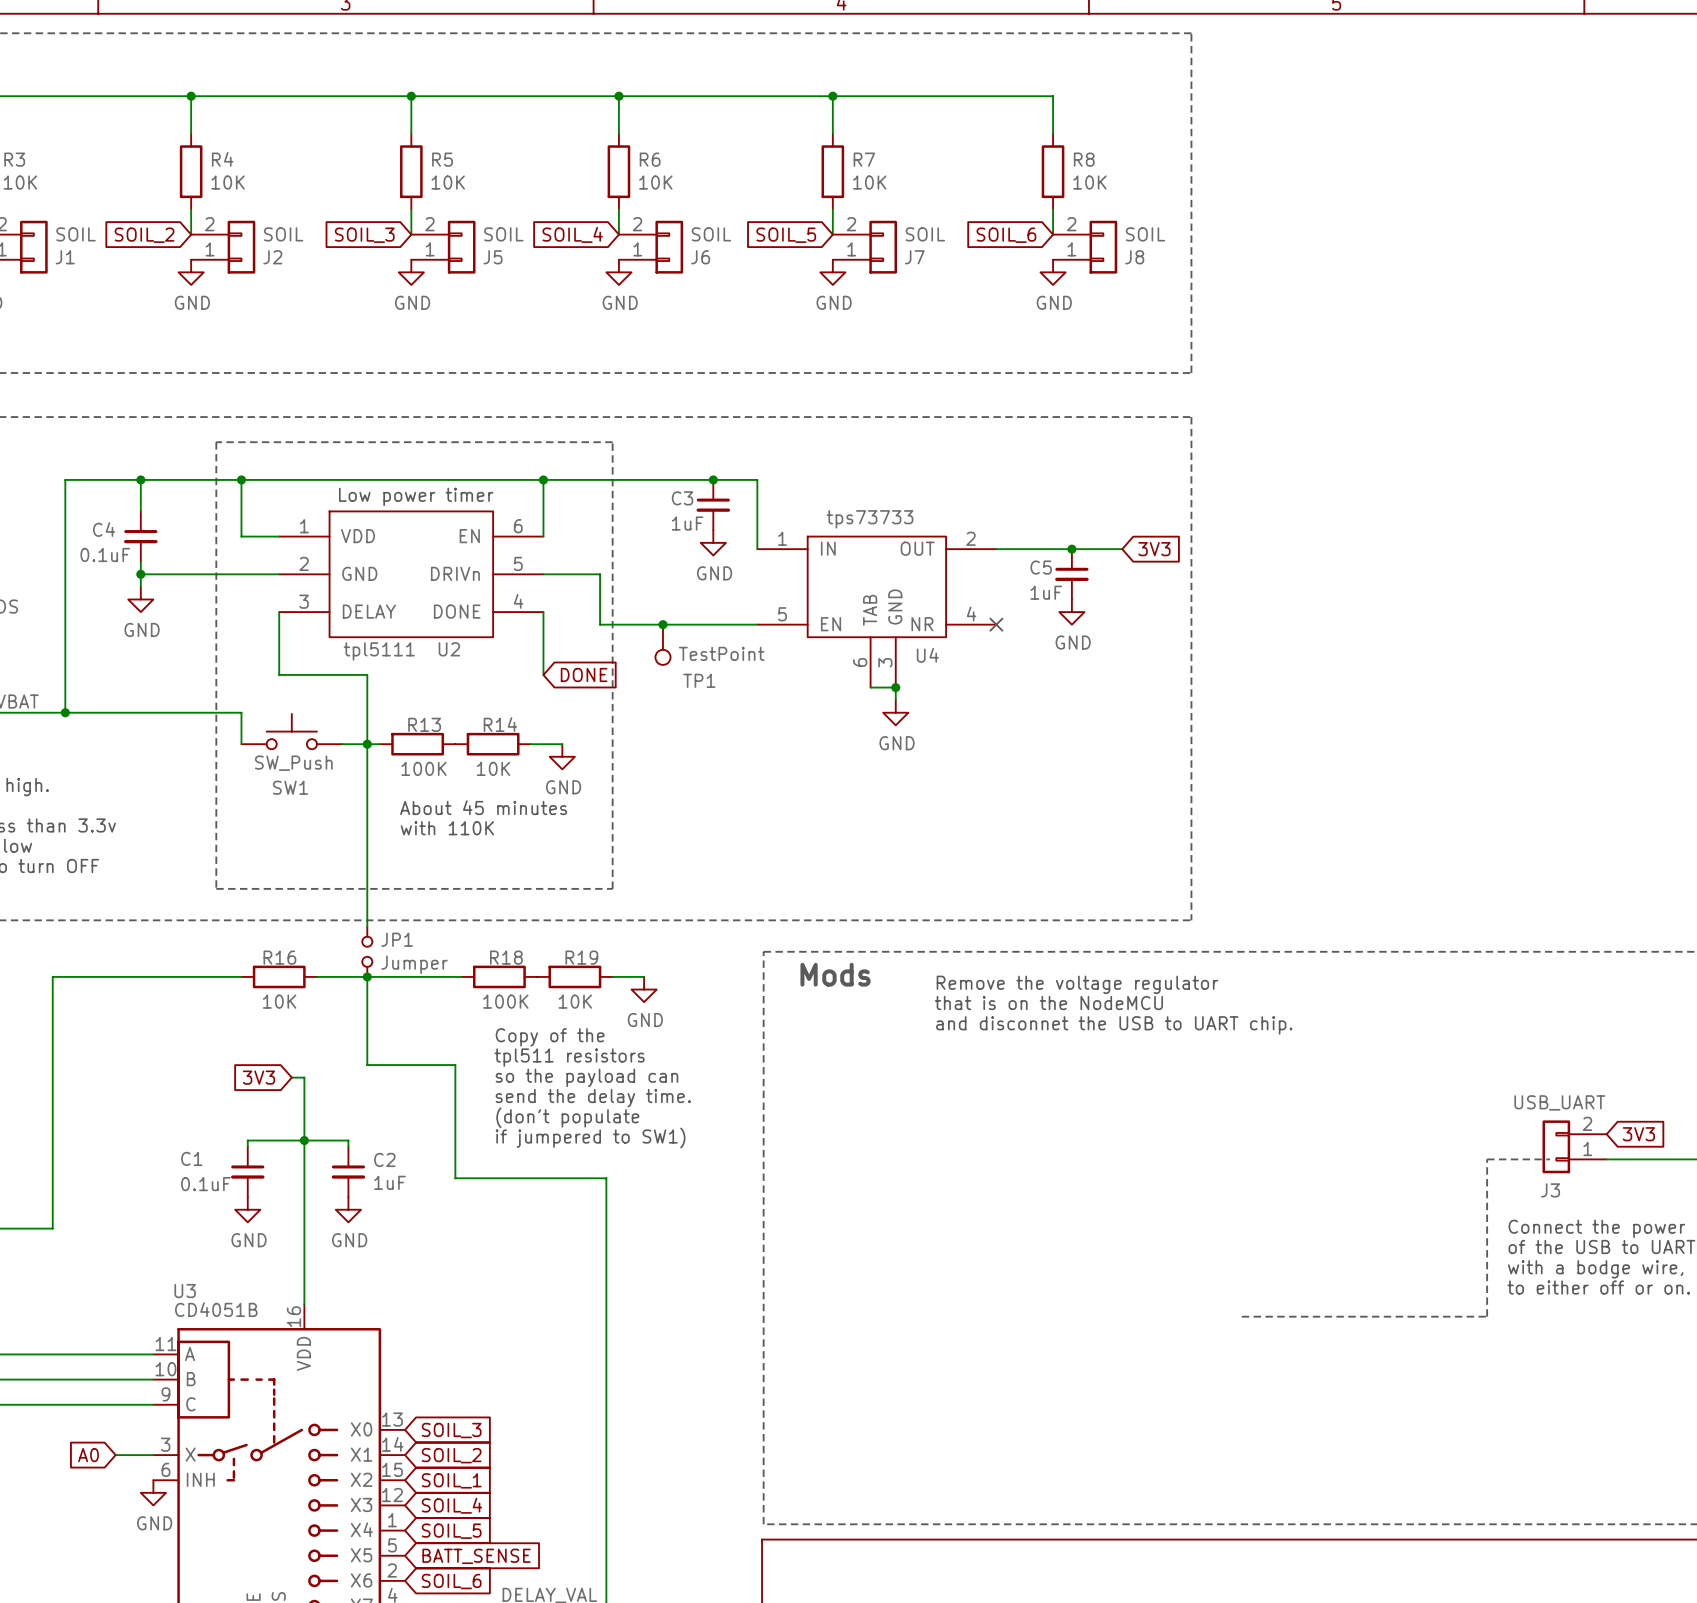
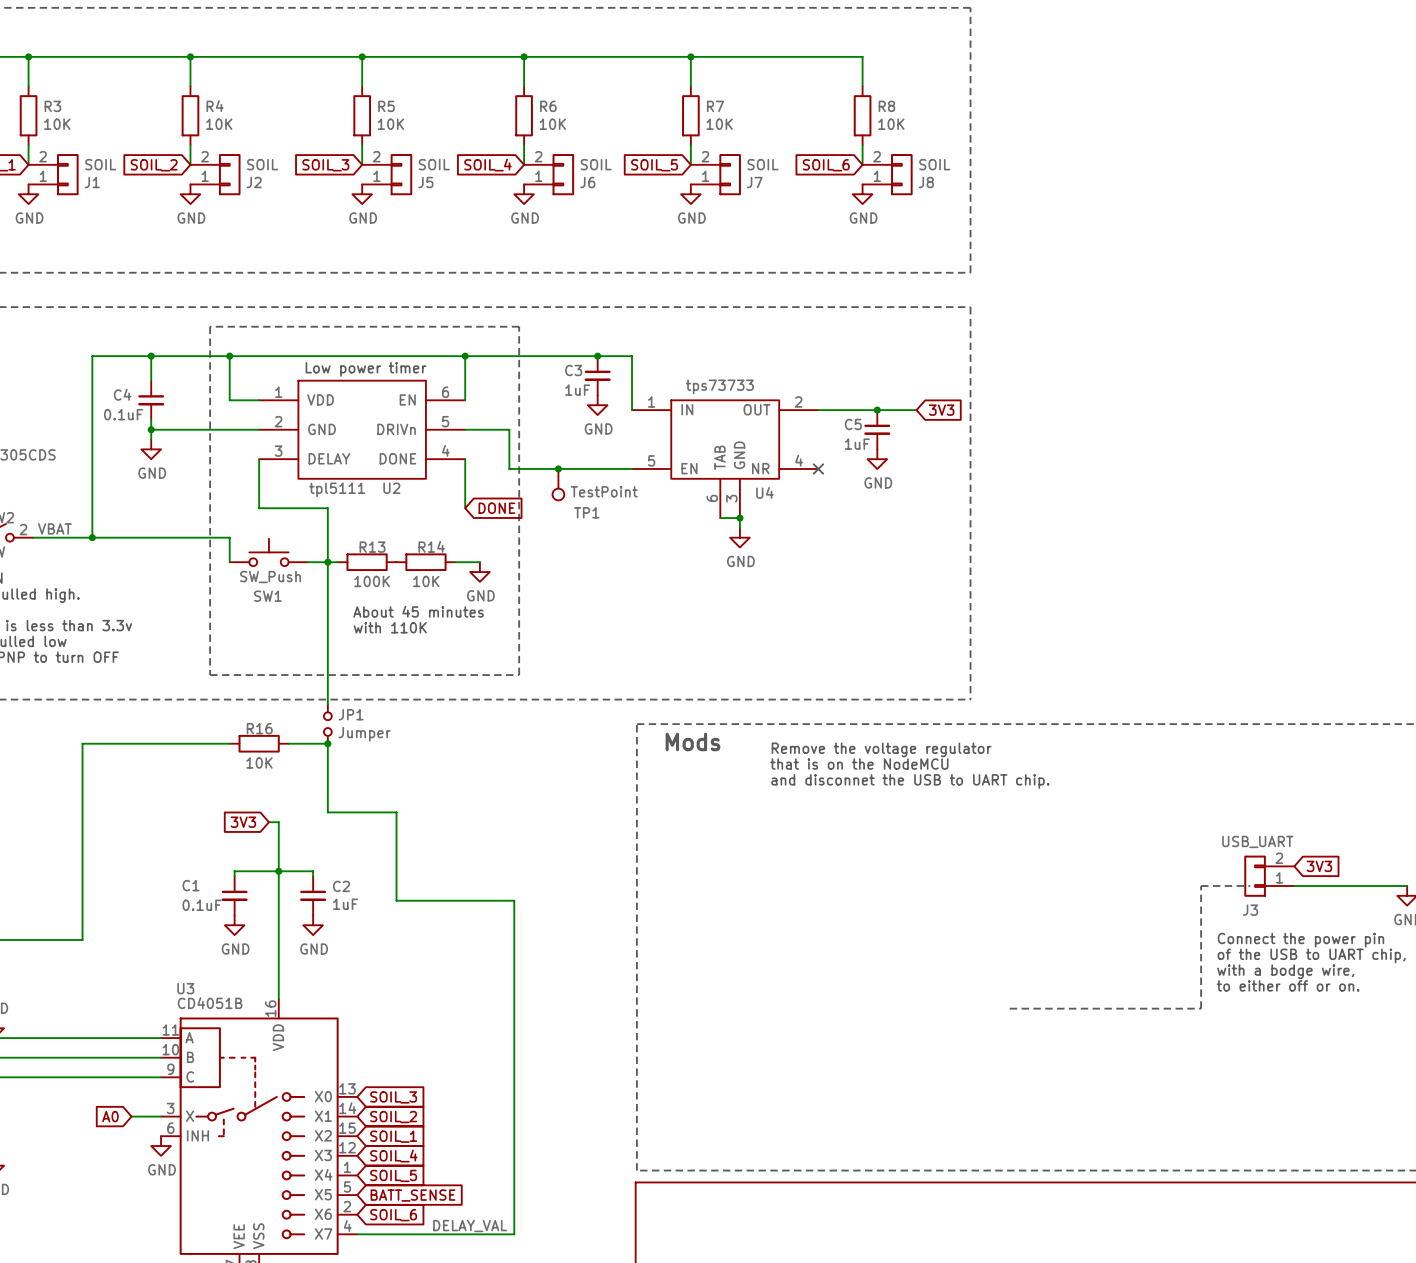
wire: (367, 976) (461, 976) -> none
R18: 100K (499, 976) -> none
R19: 10K (574, 976) -> none
wire: (612, 976) (644, 976) -> none
power symbol: GND (644, 989) -> none
text: Copy of the (550, 1037) -> none
text: tpl511 resistors (569, 1057) -> none
text: so the payload can (586, 1077) -> none
text: send the delay time. (593, 1098) -> none
text: (don't populate (567, 1117) -> none
text: if jumpered to SW1) (590, 1138) -> none

